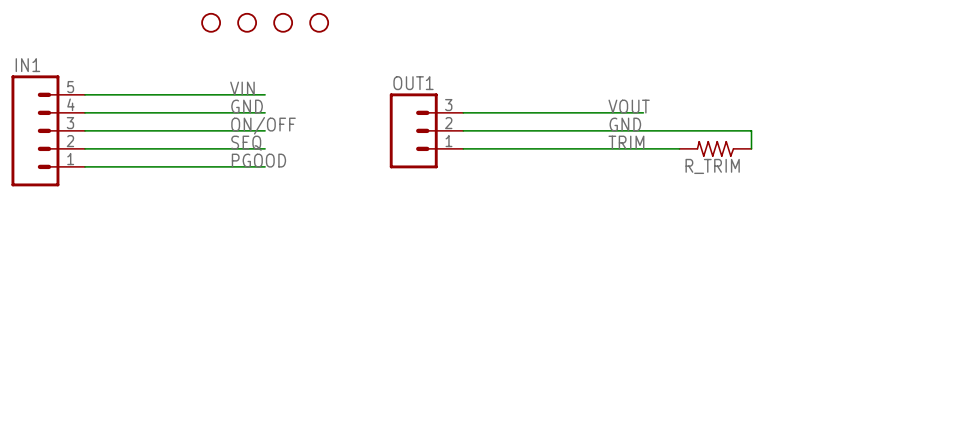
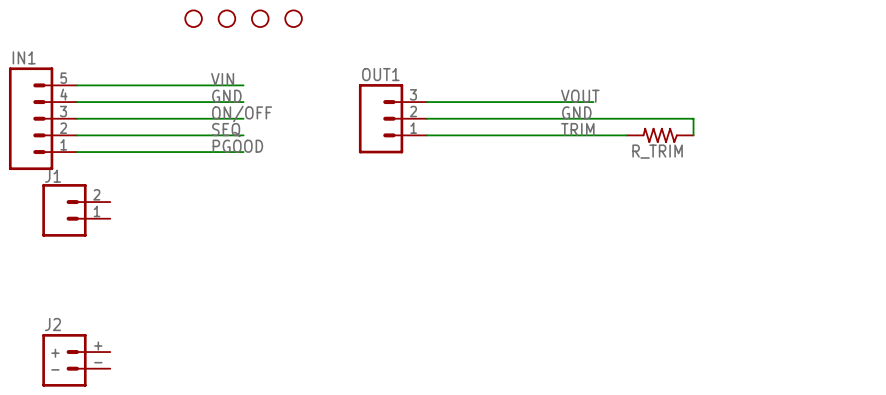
J1: none -> (76, 210)
J2: none -> (76, 360)

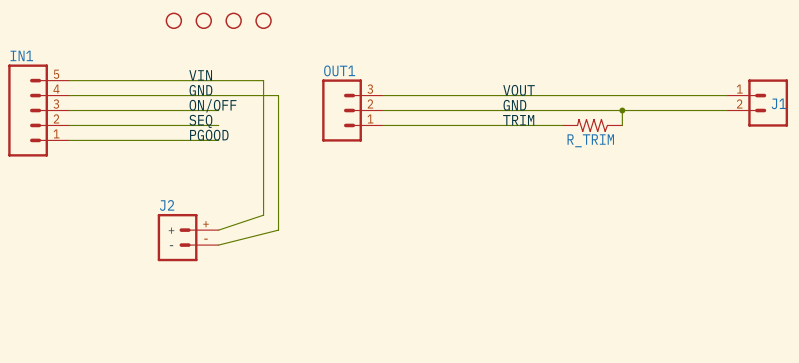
wire: none -> (218, 80) (263, 80) (263, 215) (218, 230)
wire: none -> (218, 95) (278, 95) (278, 230) (218, 245)
wire: none -> (532, 95) (727, 95)
wire: none -> (622, 110) (727, 110)
junction: none -> (622, 110)
J1 name position: J1 (52, 176) -> J1 (778, 103)
J1 rotation: 0° (64, 210) -> 180° (768, 103)
J1 position: (76, 210) -> (757, 103)
J2 position: (76, 360) -> (188, 237)

